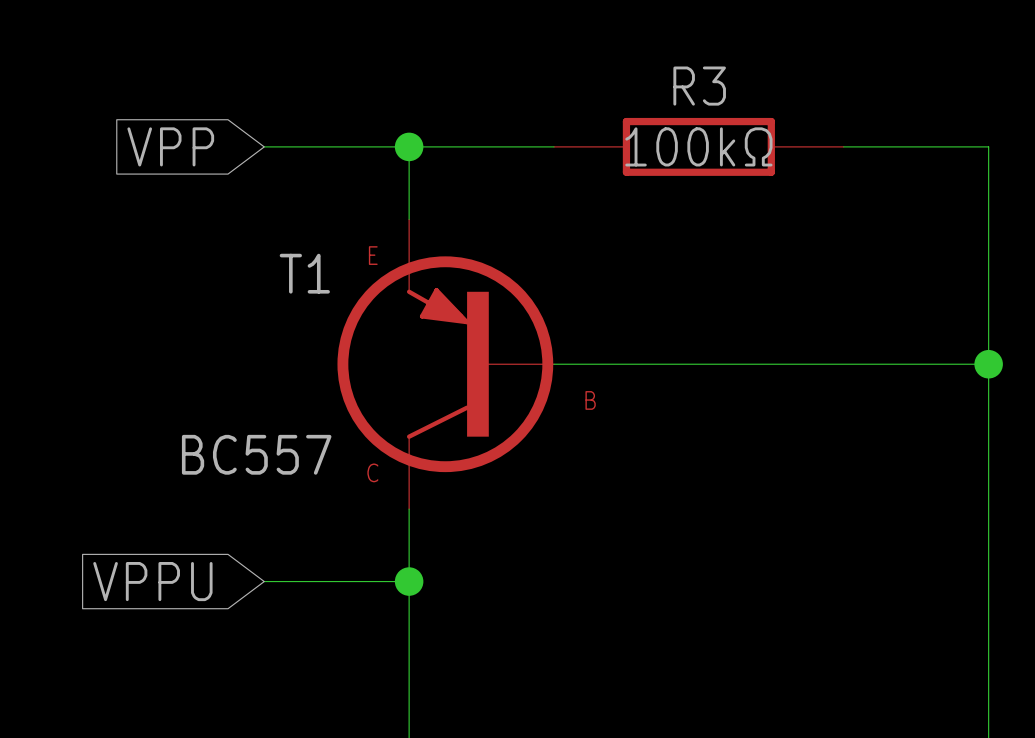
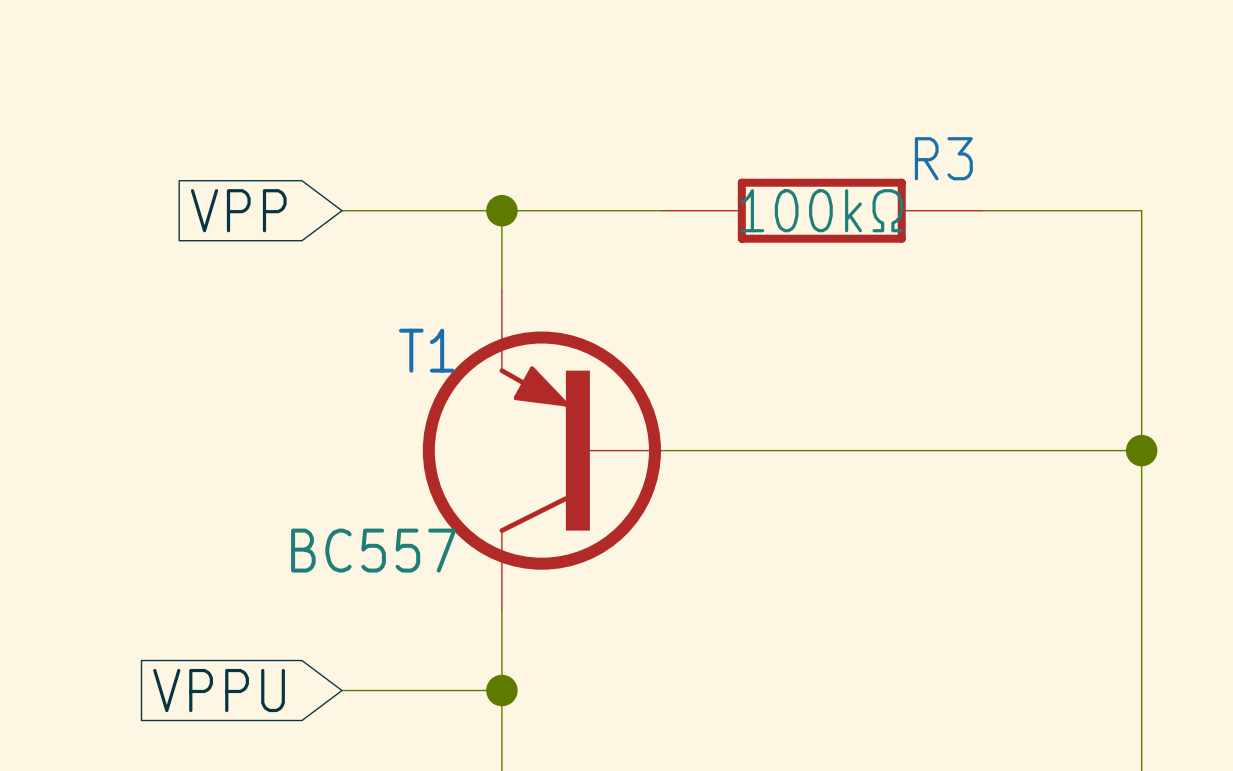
R3 name position: R3 (699, 86) -> R3 (943, 158)
T1 text: E (373, 255) -> none
T1 name position: T1 (304, 273) -> T1 (426, 350)
T1 text: B (590, 400) -> none
T1 value position: BC557 (256, 454) -> BC557 (373, 550)
T1 text: C (372, 472) -> none

